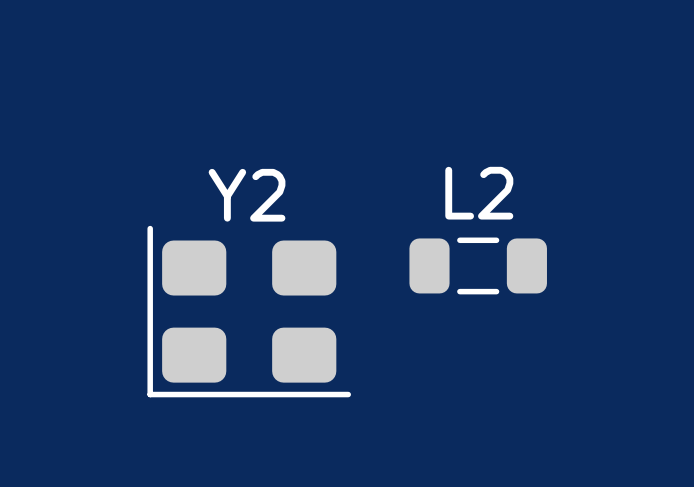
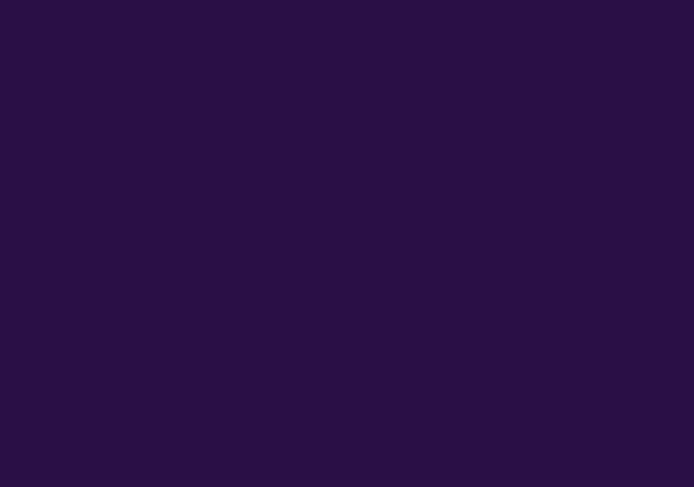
L2: (478, 265) -> none
Y2: (249, 311) -> none

